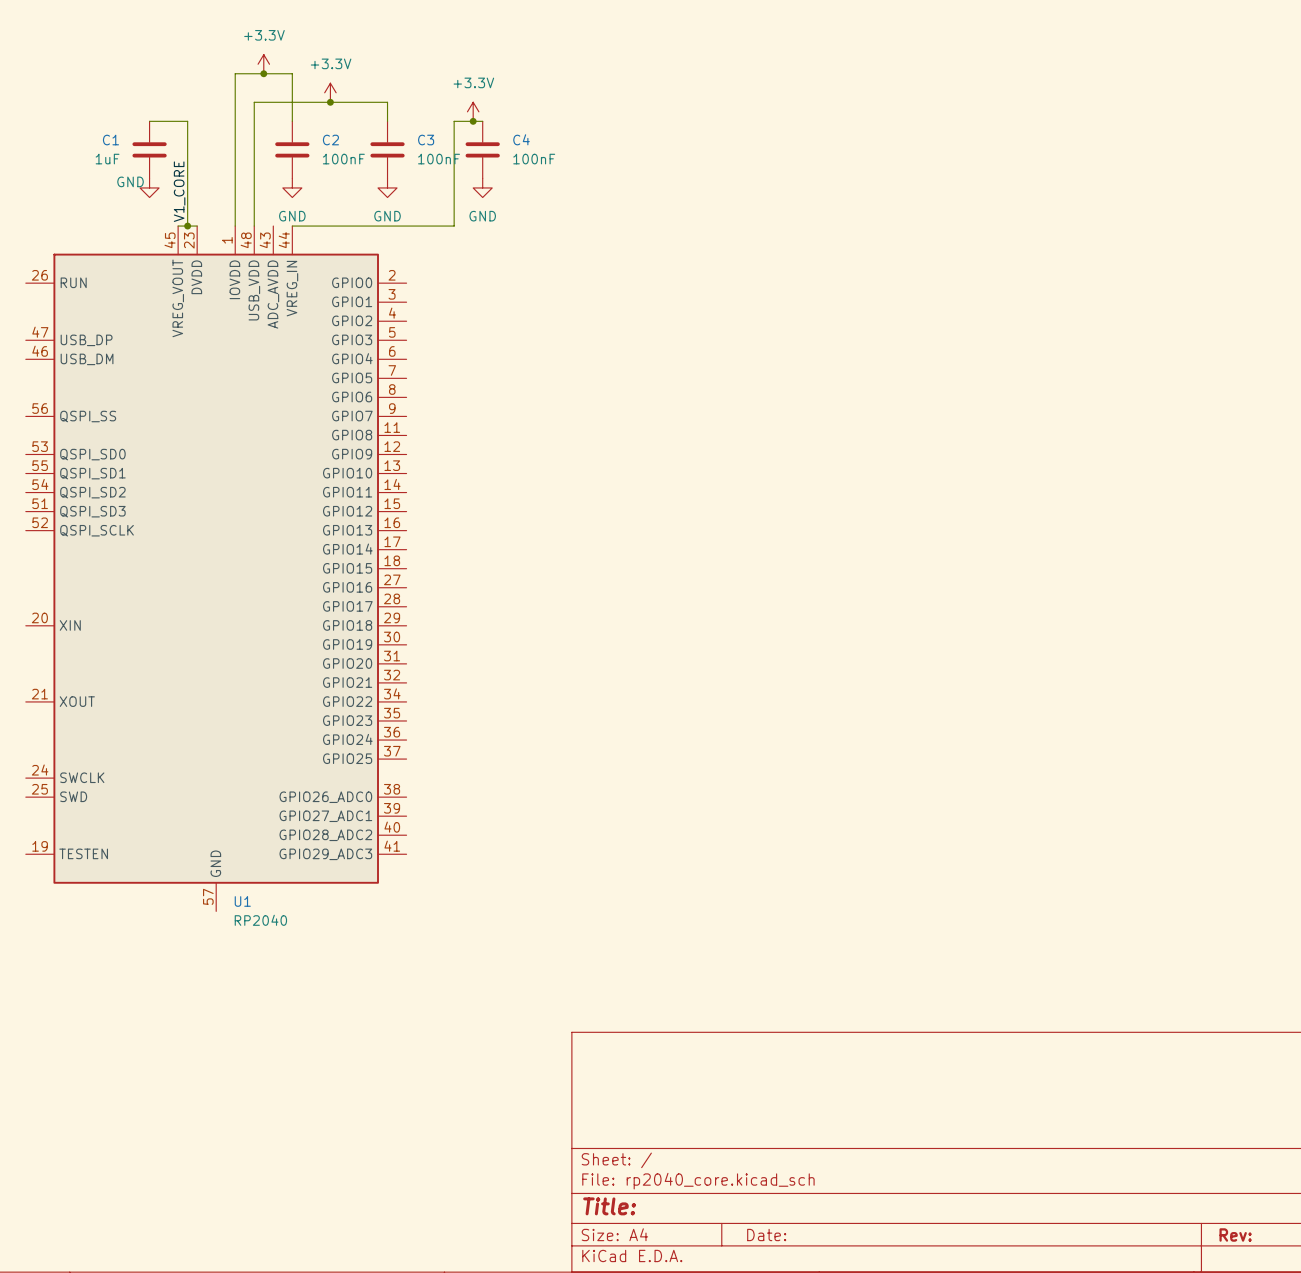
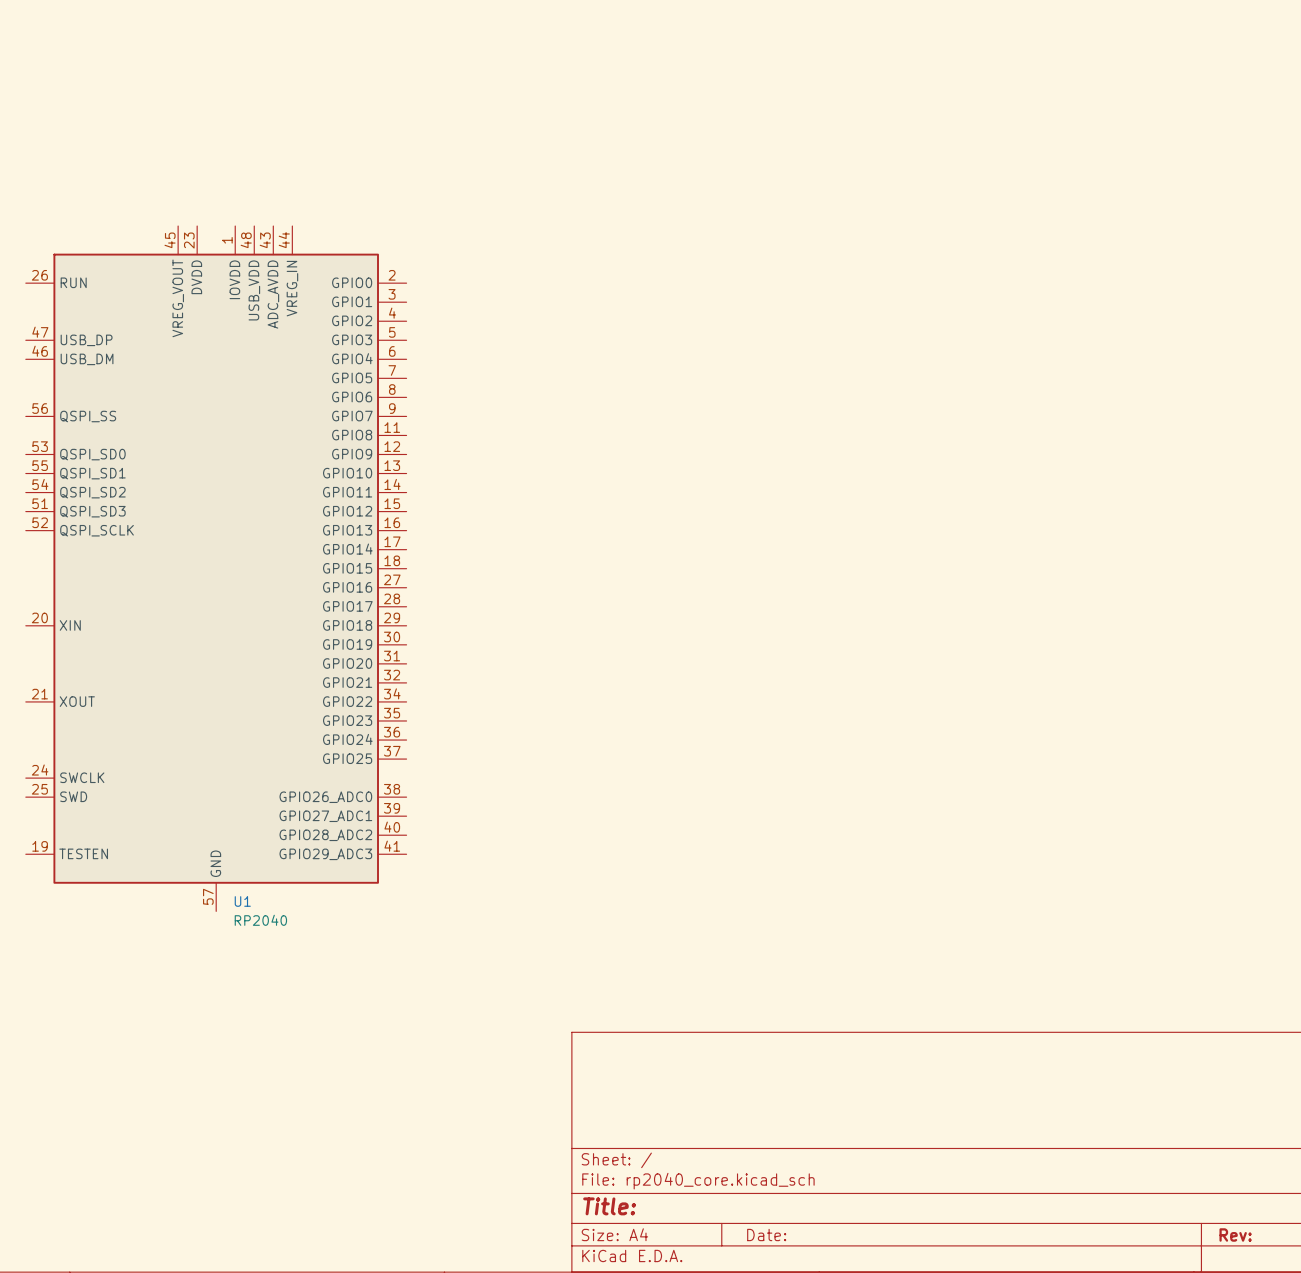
power symbol: +3.3V (263, 64) -> none
junction: (263, 73) -> none
power symbol: +3.3V (330, 92) -> none
junction: (330, 102) -> none
power symbol: +3.3V (473, 111) -> none
wire: (149, 121) (187, 121) (187, 226) -> none
wire: (292, 121) (292, 73) (235, 73) (235, 226) -> none
wire: (387, 121) (387, 102) (254, 102) (254, 226) -> none
junction: (473, 121) -> none
wire: (482, 121) (454, 121) (454, 226) (292, 226) -> none
C1: 1uF (149, 149) -> none
C2: 100nF (292, 149) -> none
C3: 100nF (387, 149) -> none
C4: 100nF (482, 149) -> none
power symbol: GND (149, 187) -> none
power symbol: GND (292, 187) -> none
power symbol: GND (387, 187) -> none
power symbol: GND (482, 187) -> none
label: V1_CORE (179, 191) -> none
wire: (178, 226) (197, 226) -> none
junction: (187, 226) -> none

